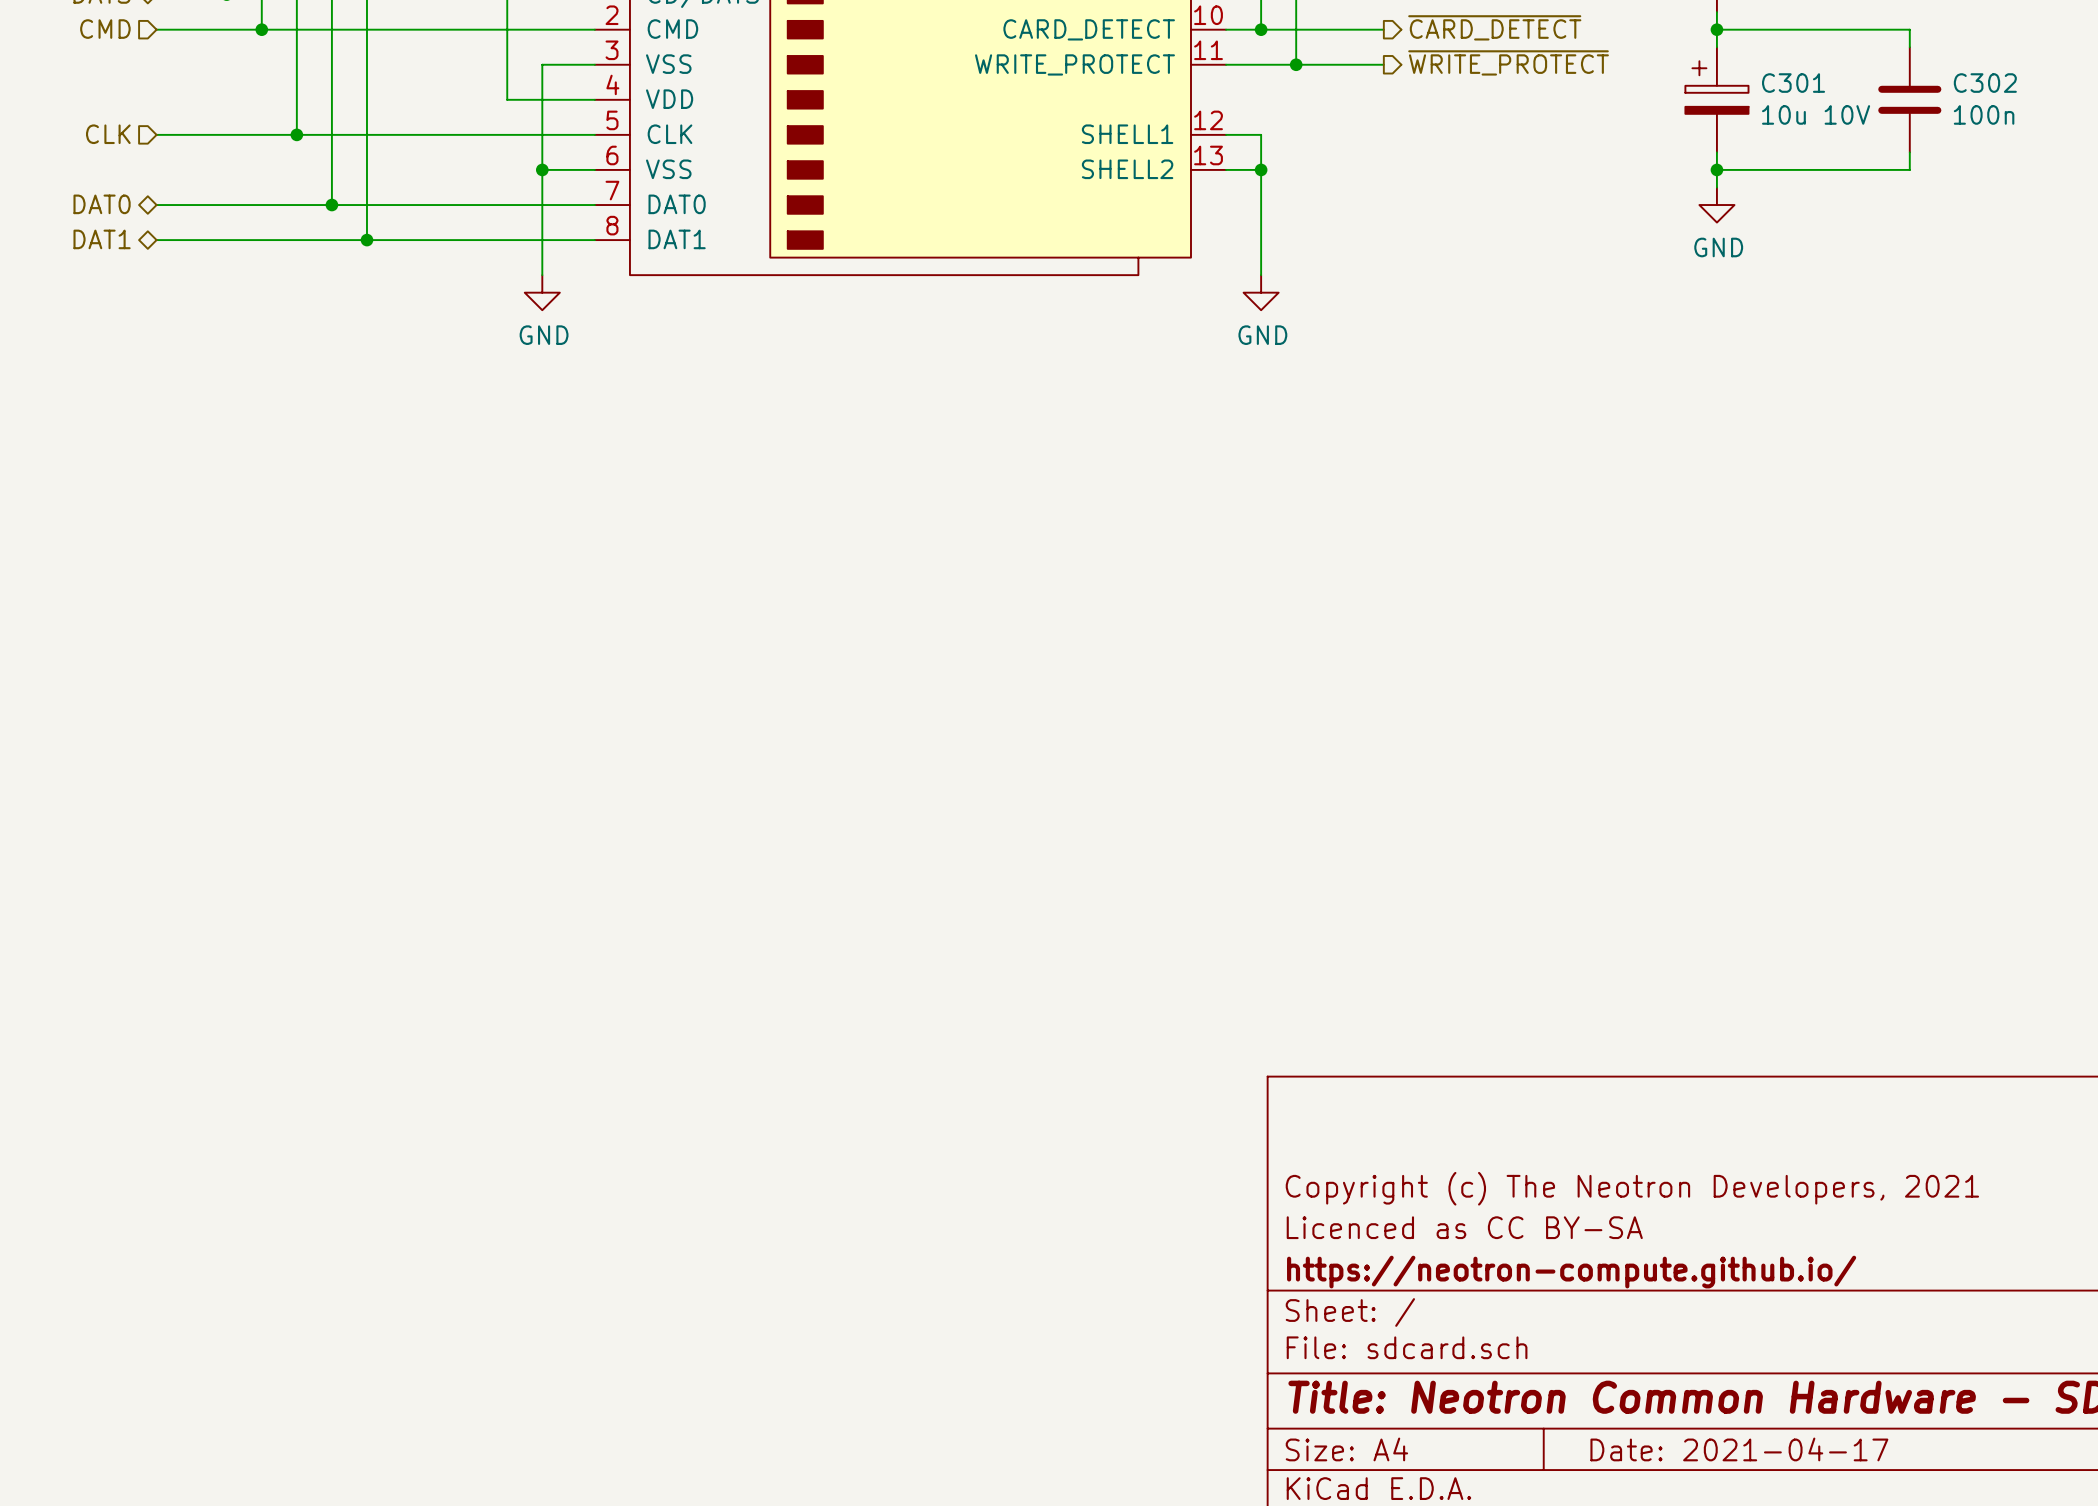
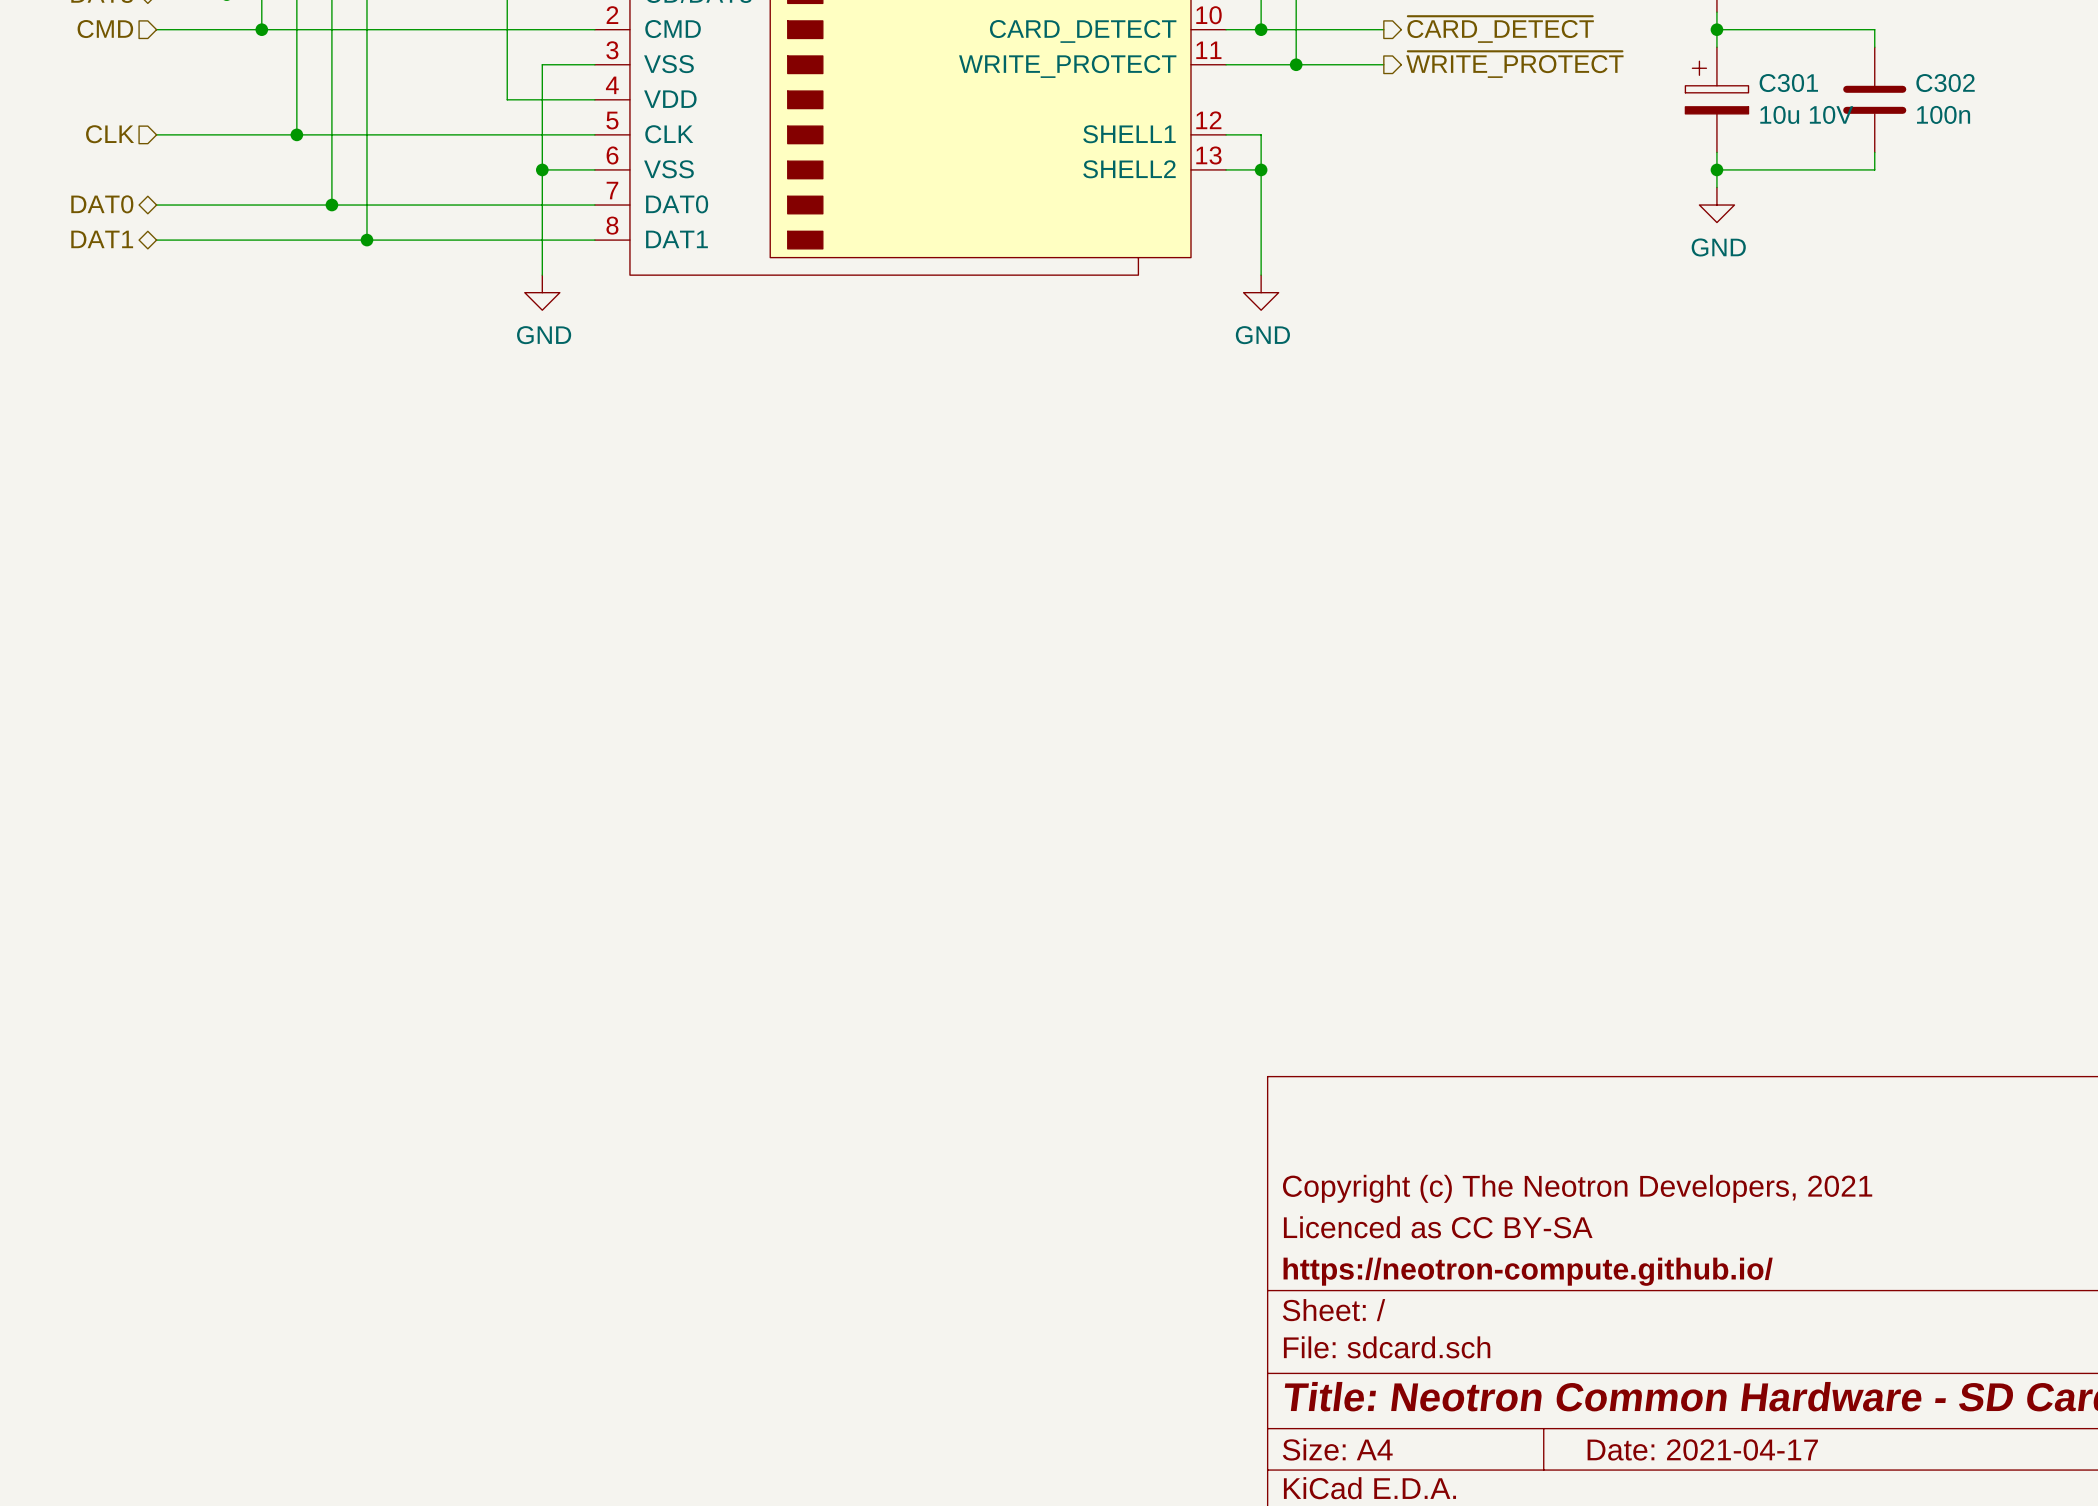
wire: (1874, 29) (1909, 29) (1909, 47) -> (1874, 29) (1874, 47)
C302 position: (1909, 99) -> (1874, 99)
wire: (1909, 152) (1909, 169) (1874, 169) -> (1874, 152) (1874, 169)

